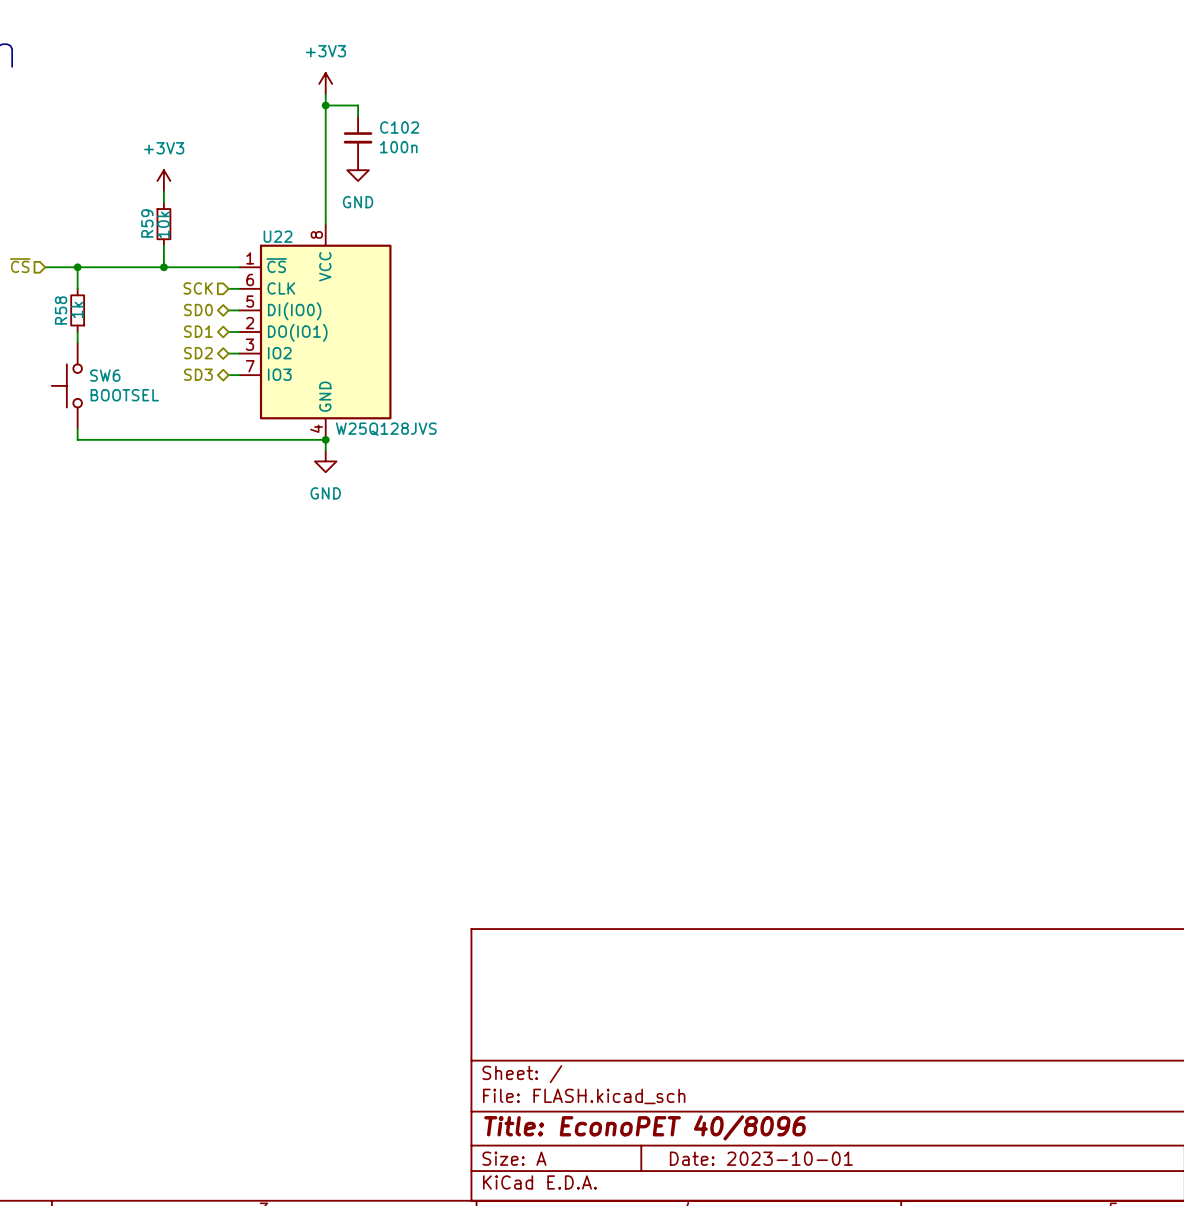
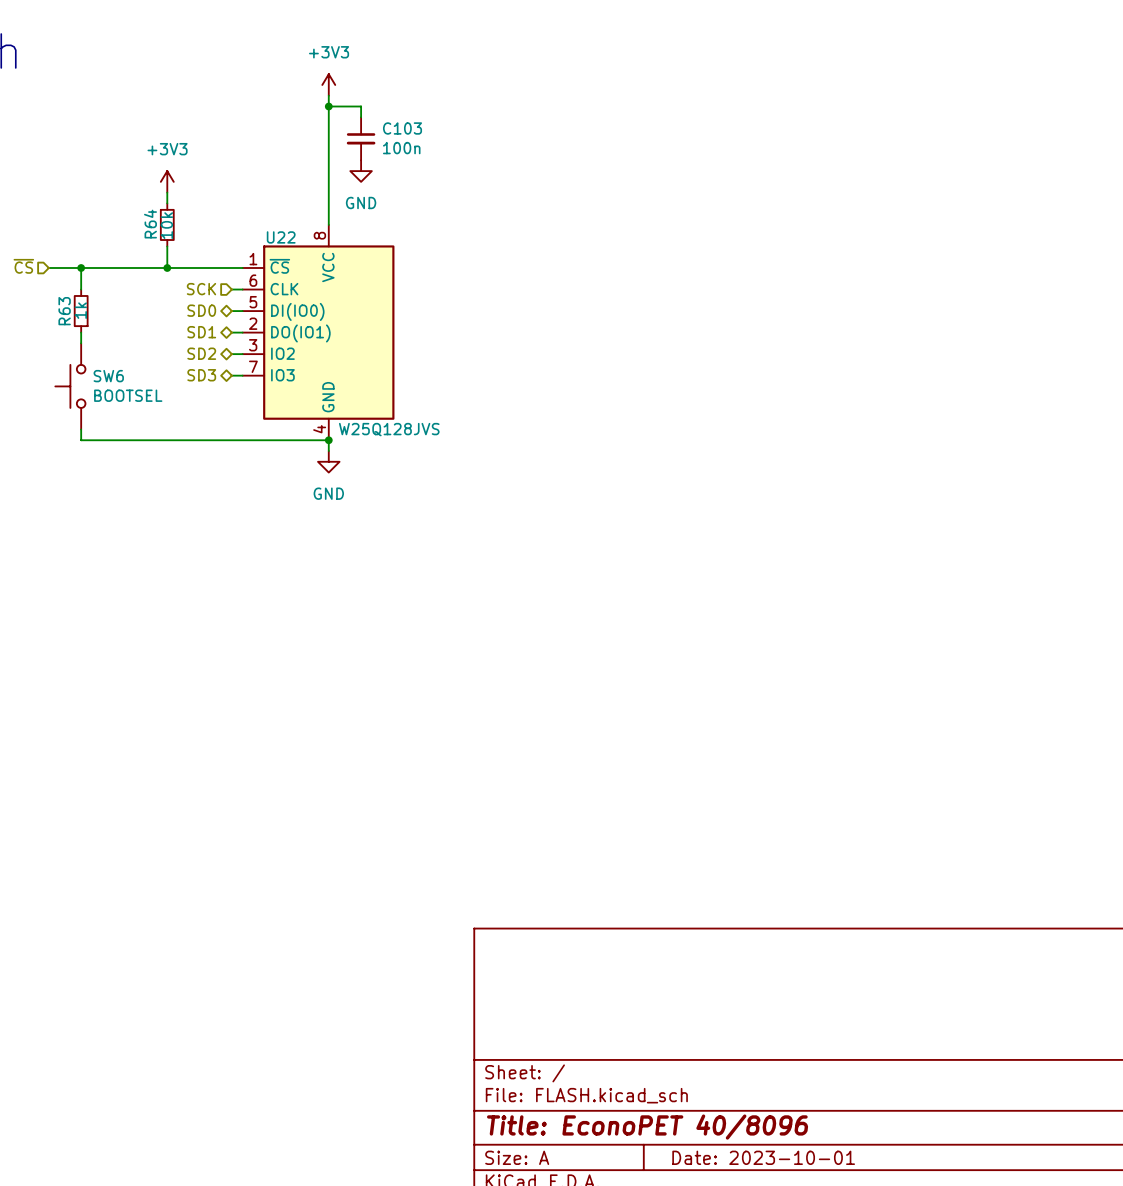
C102 name: C102 (399, 127) -> C103 (402, 128)
R59 name: R59 (147, 223) -> R64 (150, 224)
R58 name: R58 (61, 310) -> R63 (64, 311)

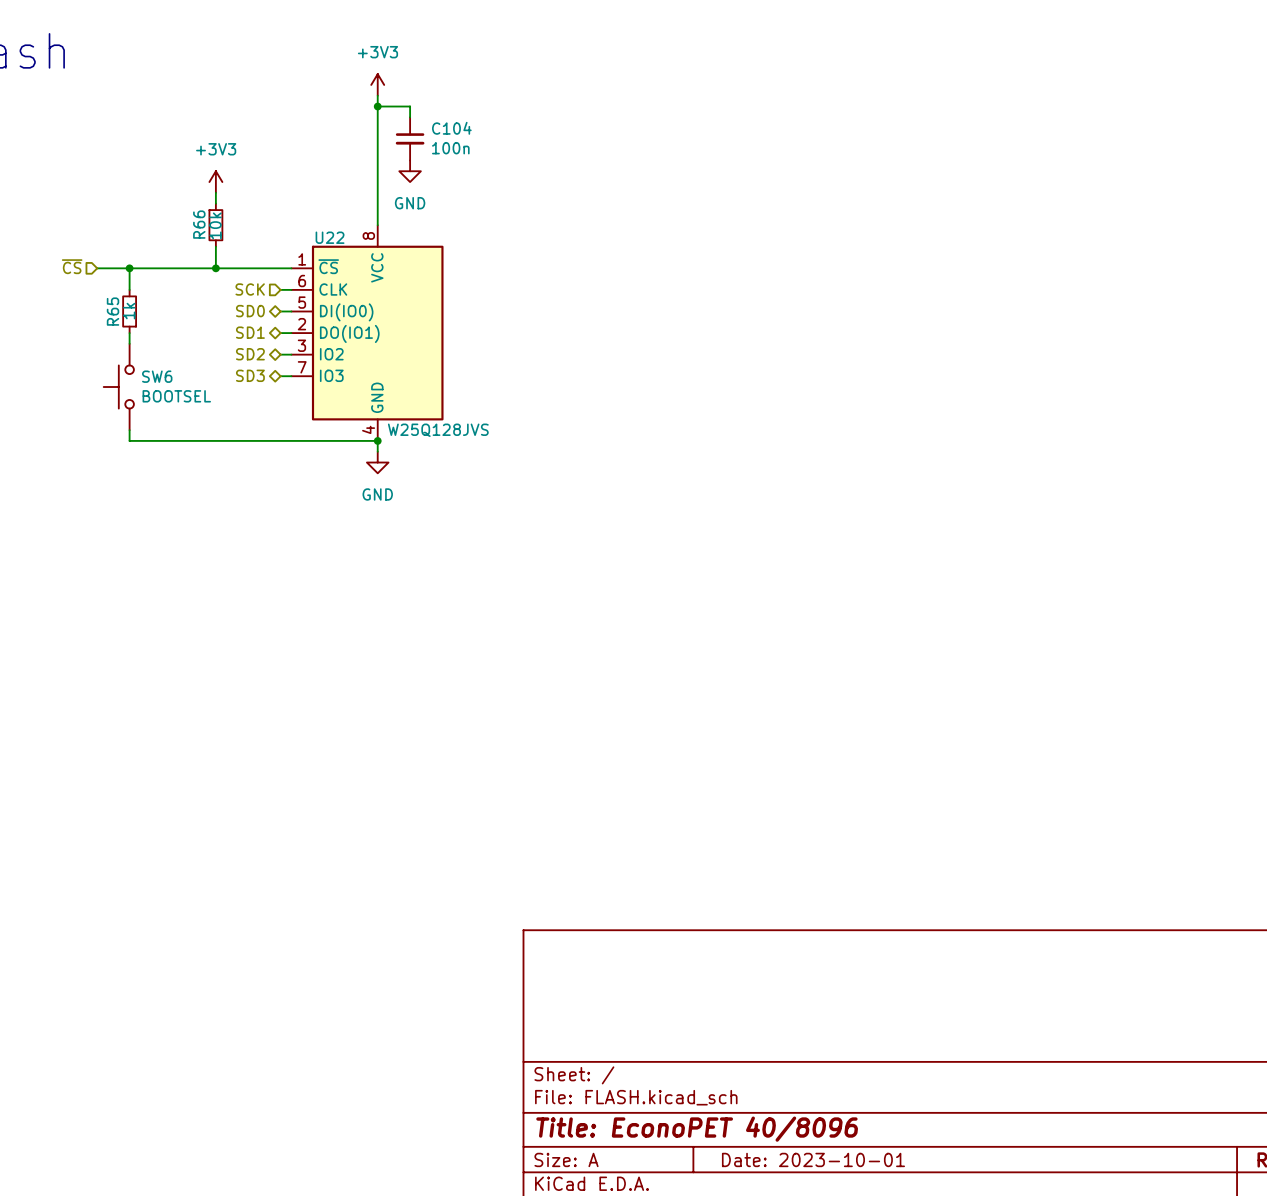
C103 name: C103 (402, 128) -> C104 (451, 128)
R64 name: R64 (150, 224) -> R66 (199, 224)
R63 name: R63 (64, 311) -> R65 (113, 311)

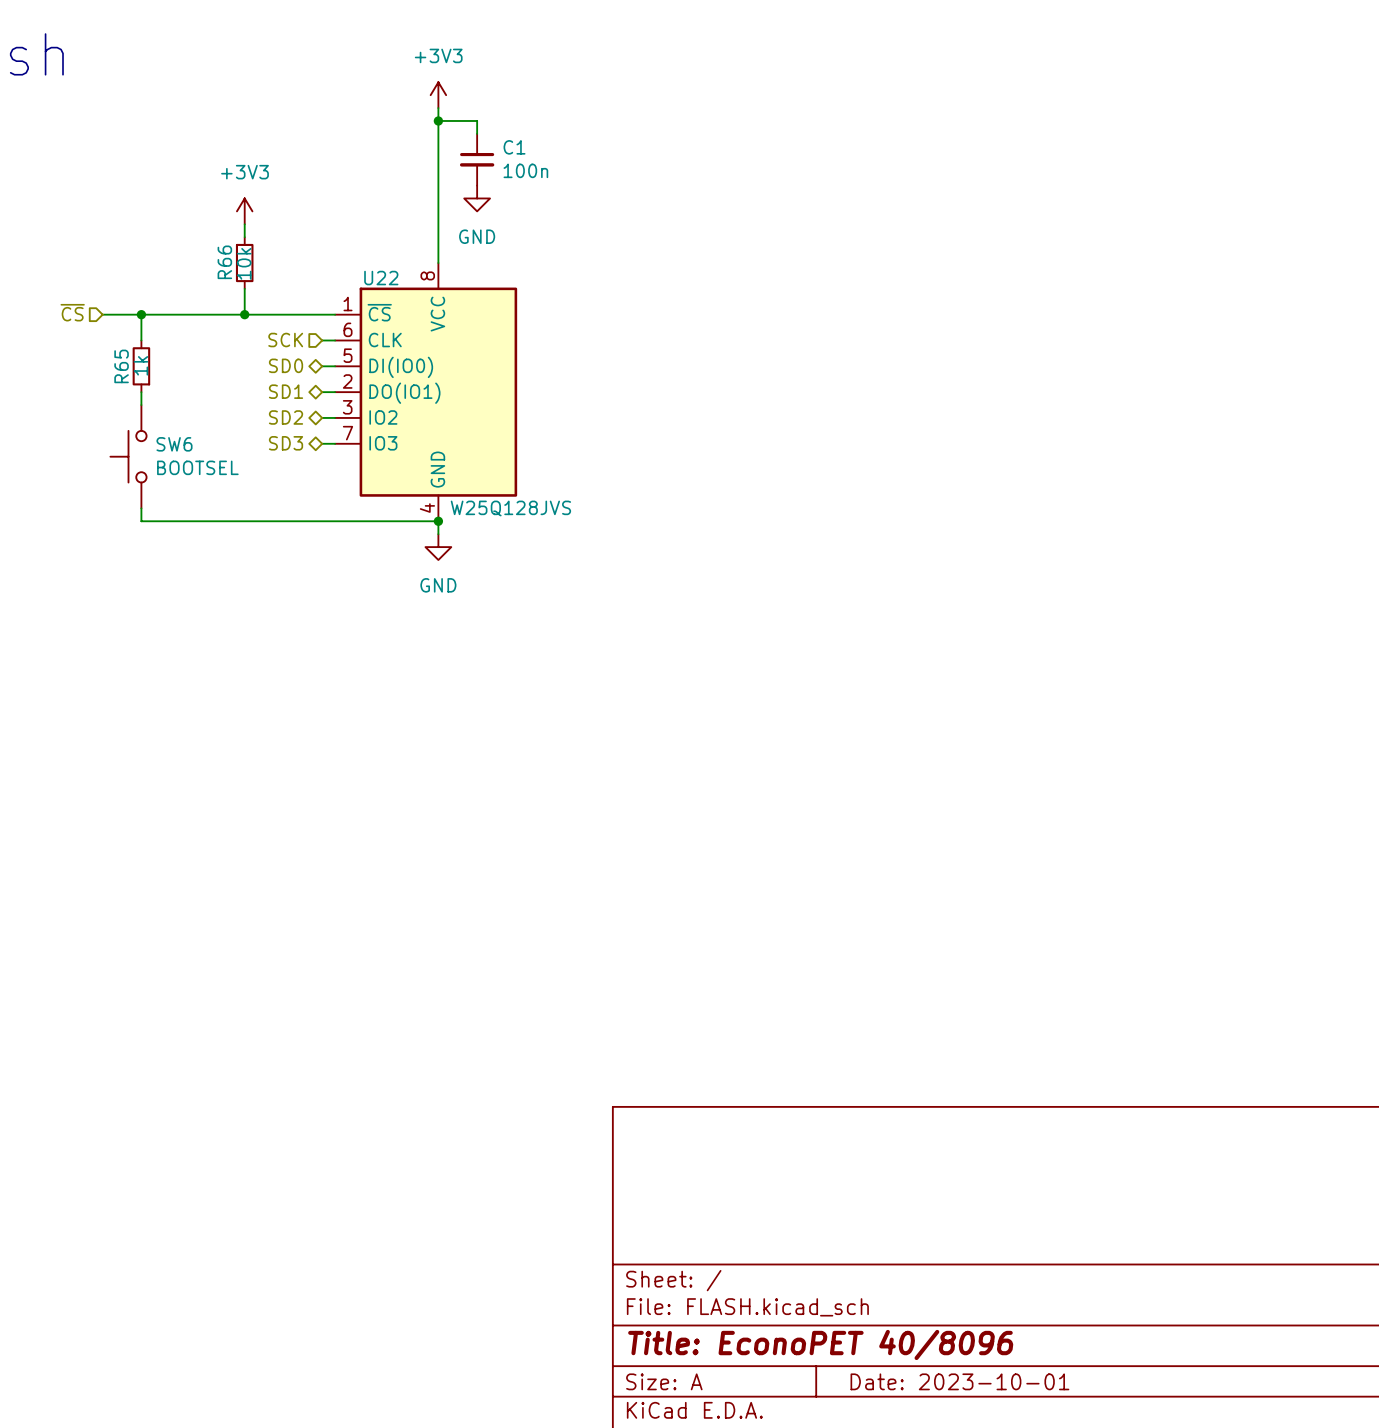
C104 name: C104 (451, 128) -> C1 (514, 147)

